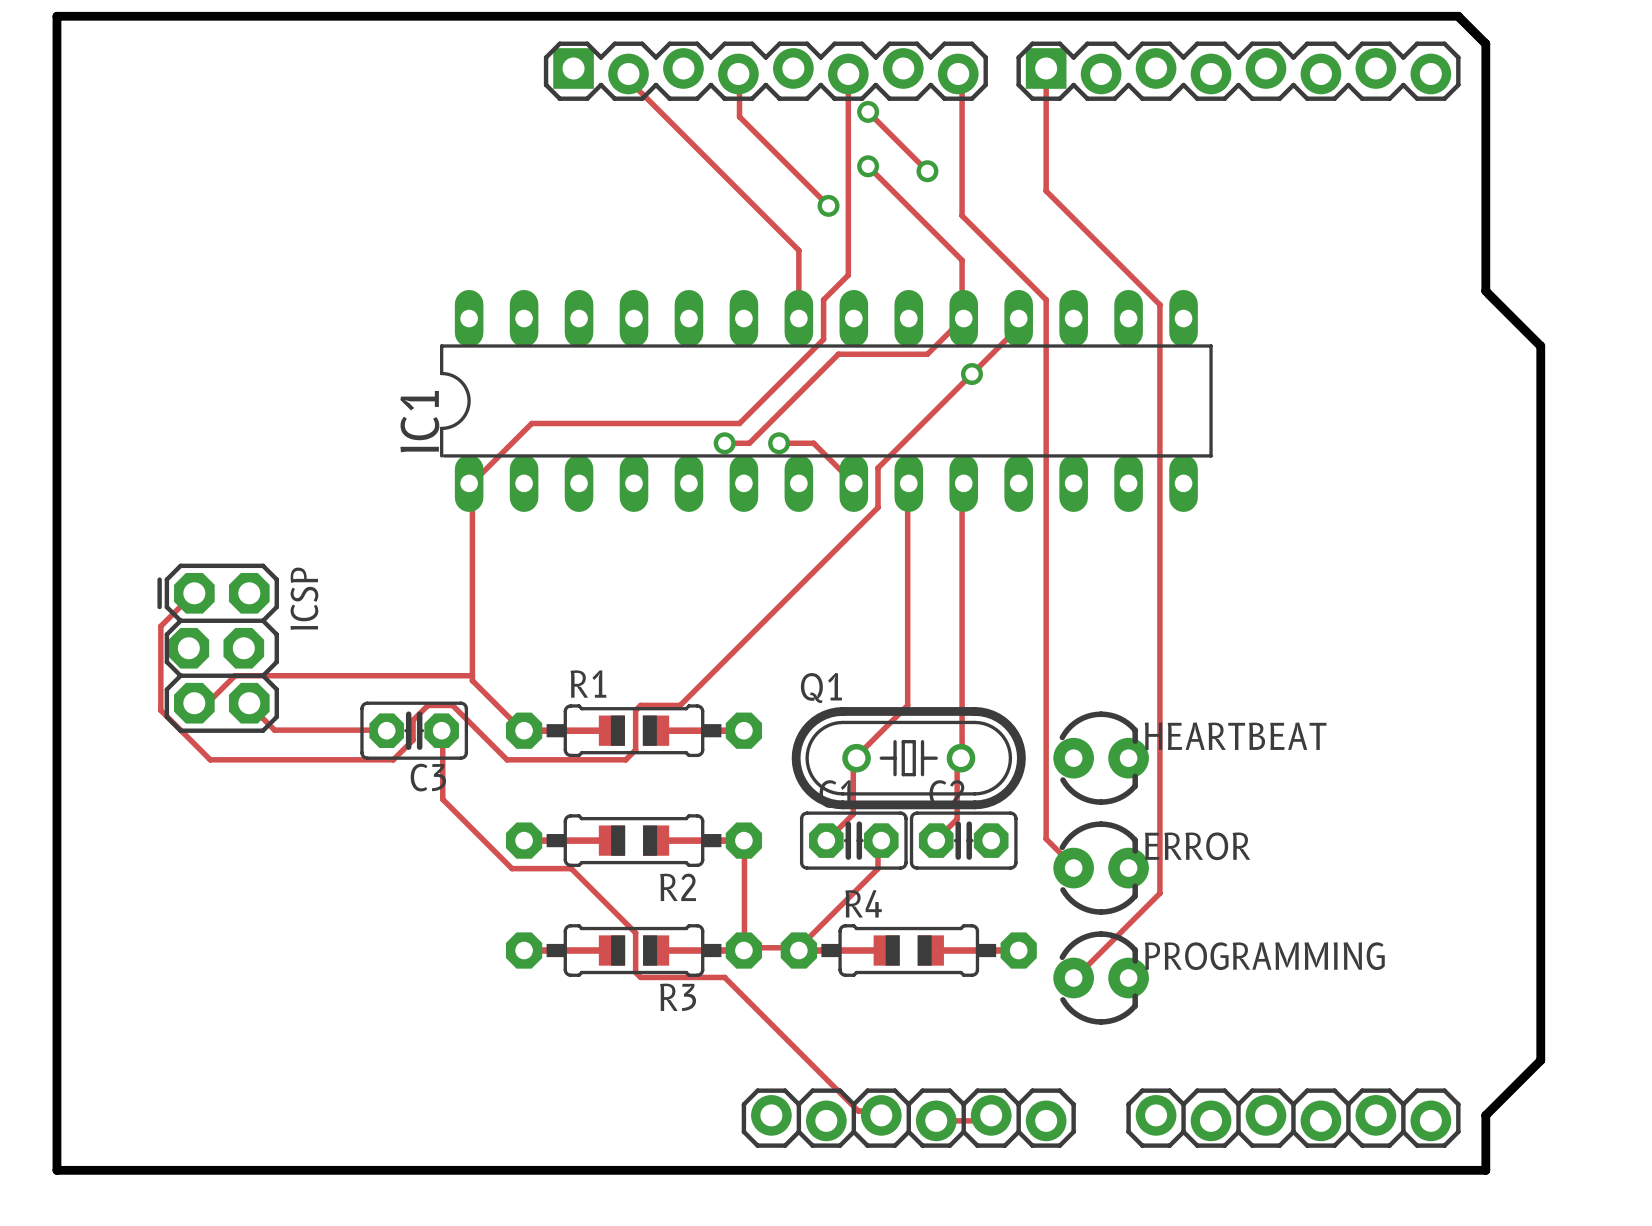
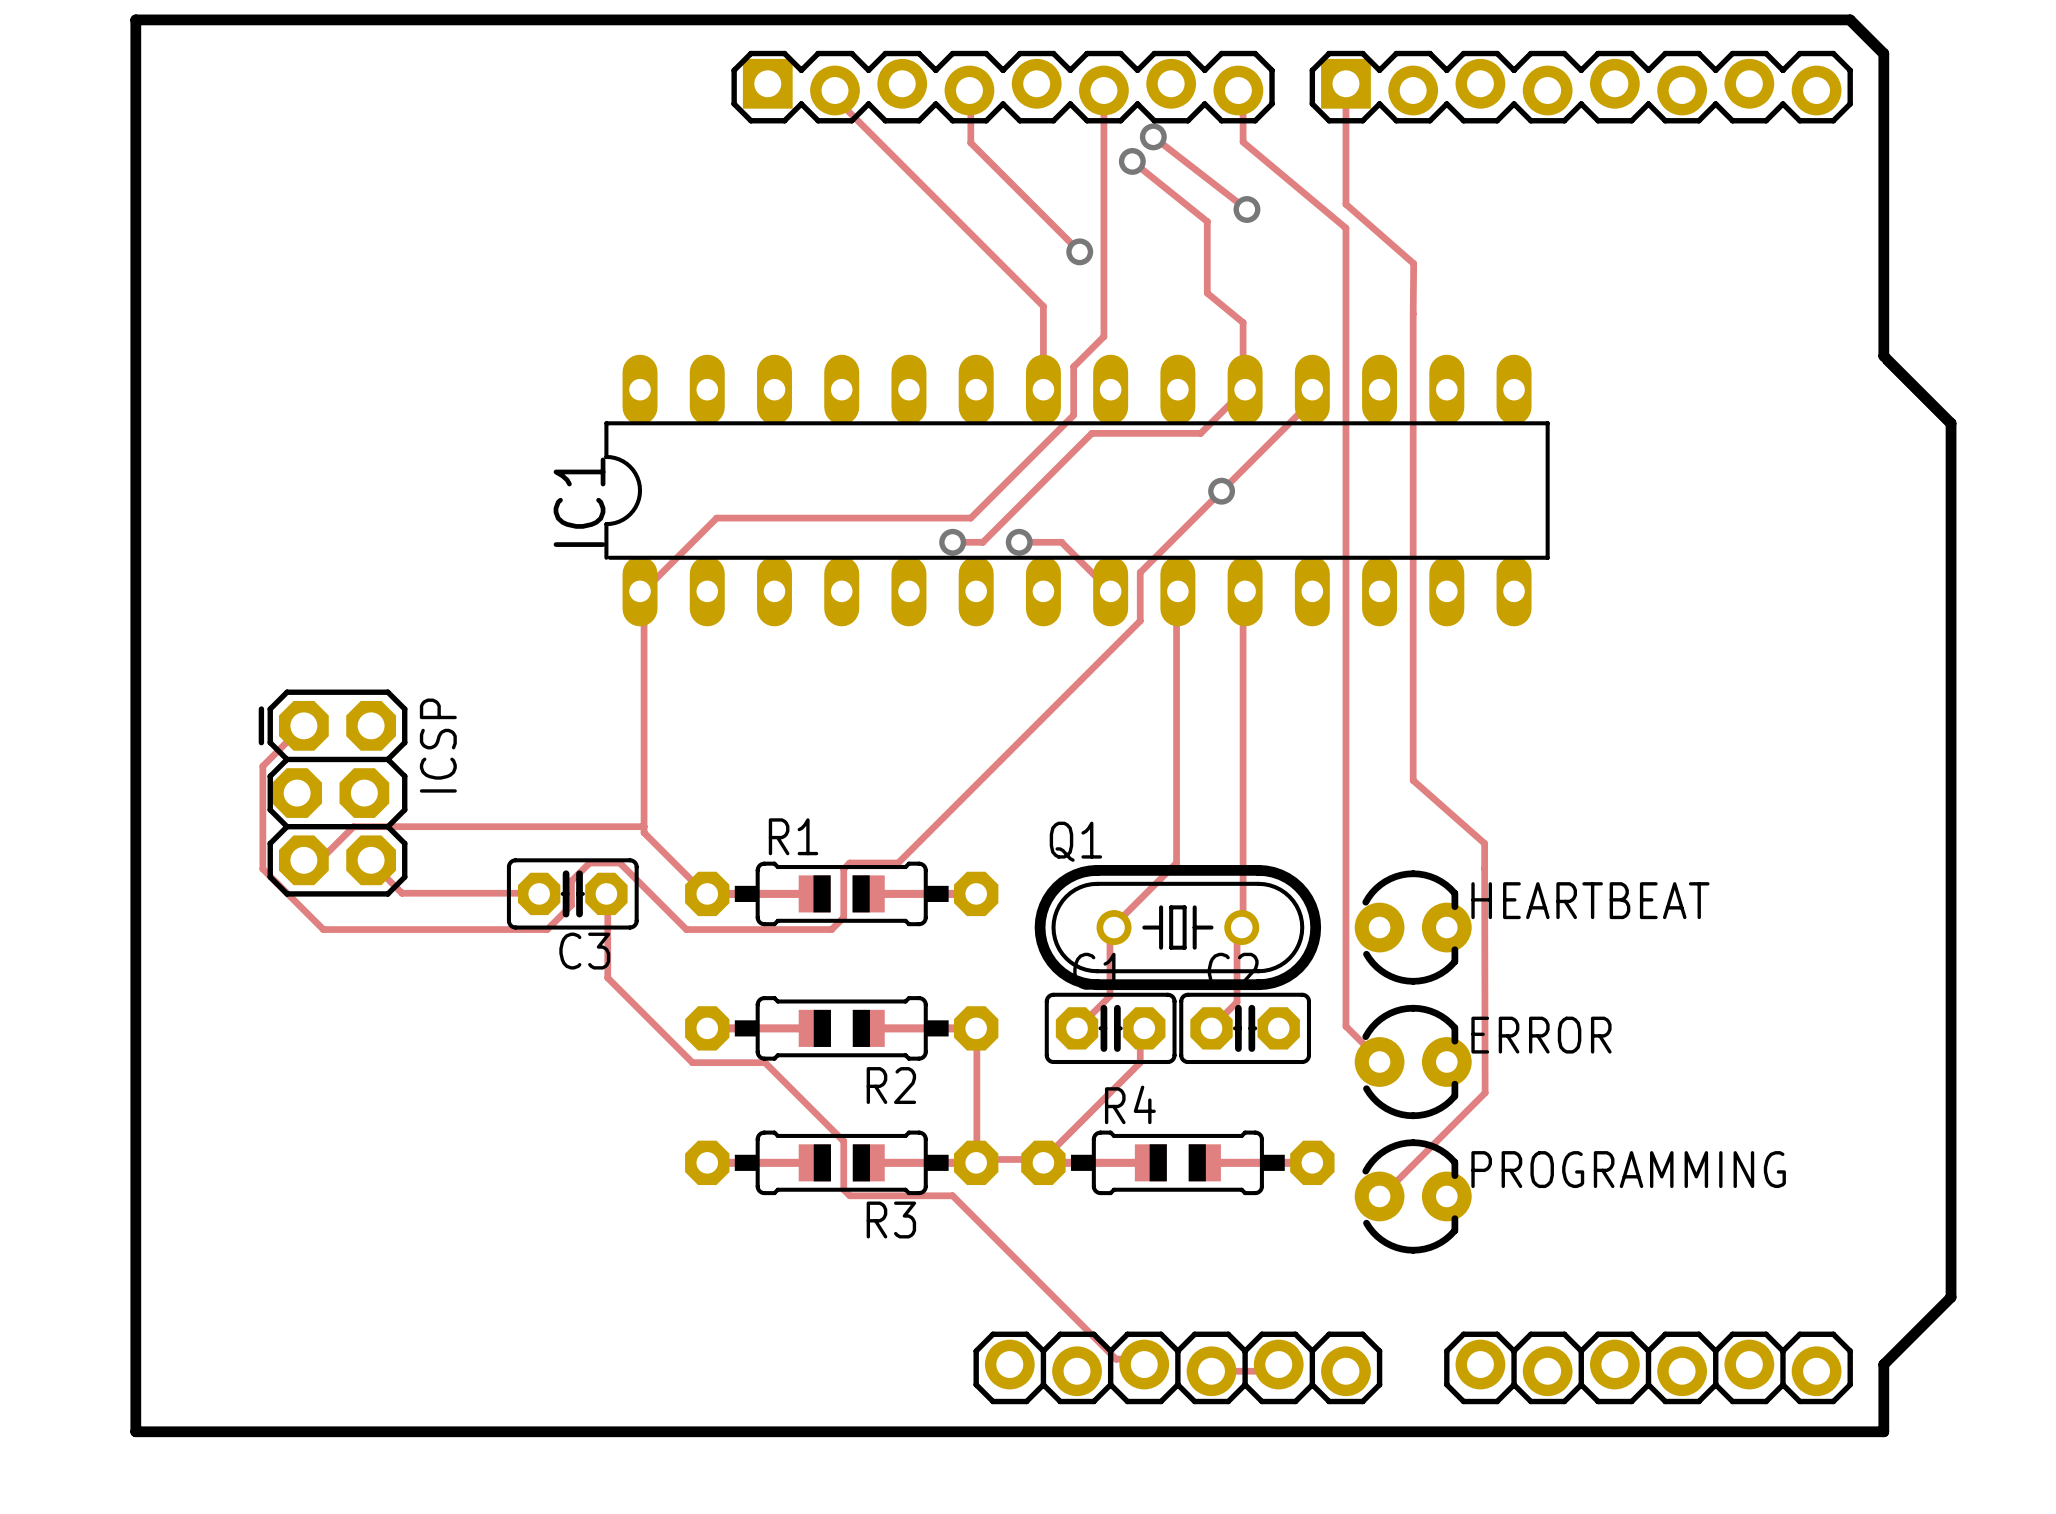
track: (868, 111) (927, 171) -> none
via: (868, 111) -> none
track: none -> (1153, 136) (1246, 209)
via: none -> (1153, 136)
track: (962, 116) (962, 215) (1046, 299) -> (1345, 233) (1345, 366)
via: none -> (1132, 161)
track: (868, 166) (962, 260) (962, 263) -> (1132, 161) (1207, 221) (1207, 293) (1243, 322)
via: (868, 166) -> none
track: (1046, 166) (1046, 186) -> (1243, 142) (1345, 228)
via: (927, 171) -> none
via: none -> (1246, 209)
track: (1046, 191) (1159, 304) (1159, 893) -> (1345, 204) (1413, 263) (1413, 780) (1484, 843) (1485, 1092)
via position: (971, 374) -> (1221, 491)

